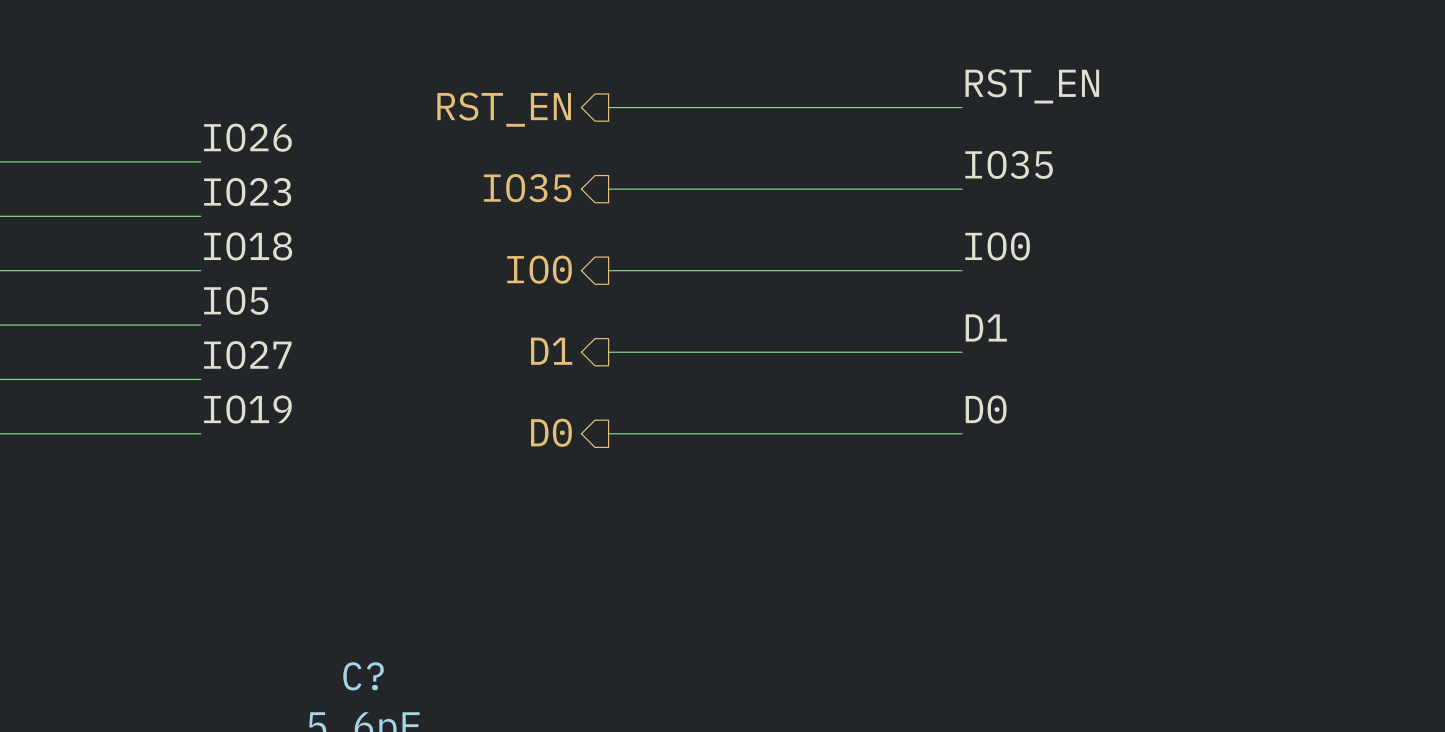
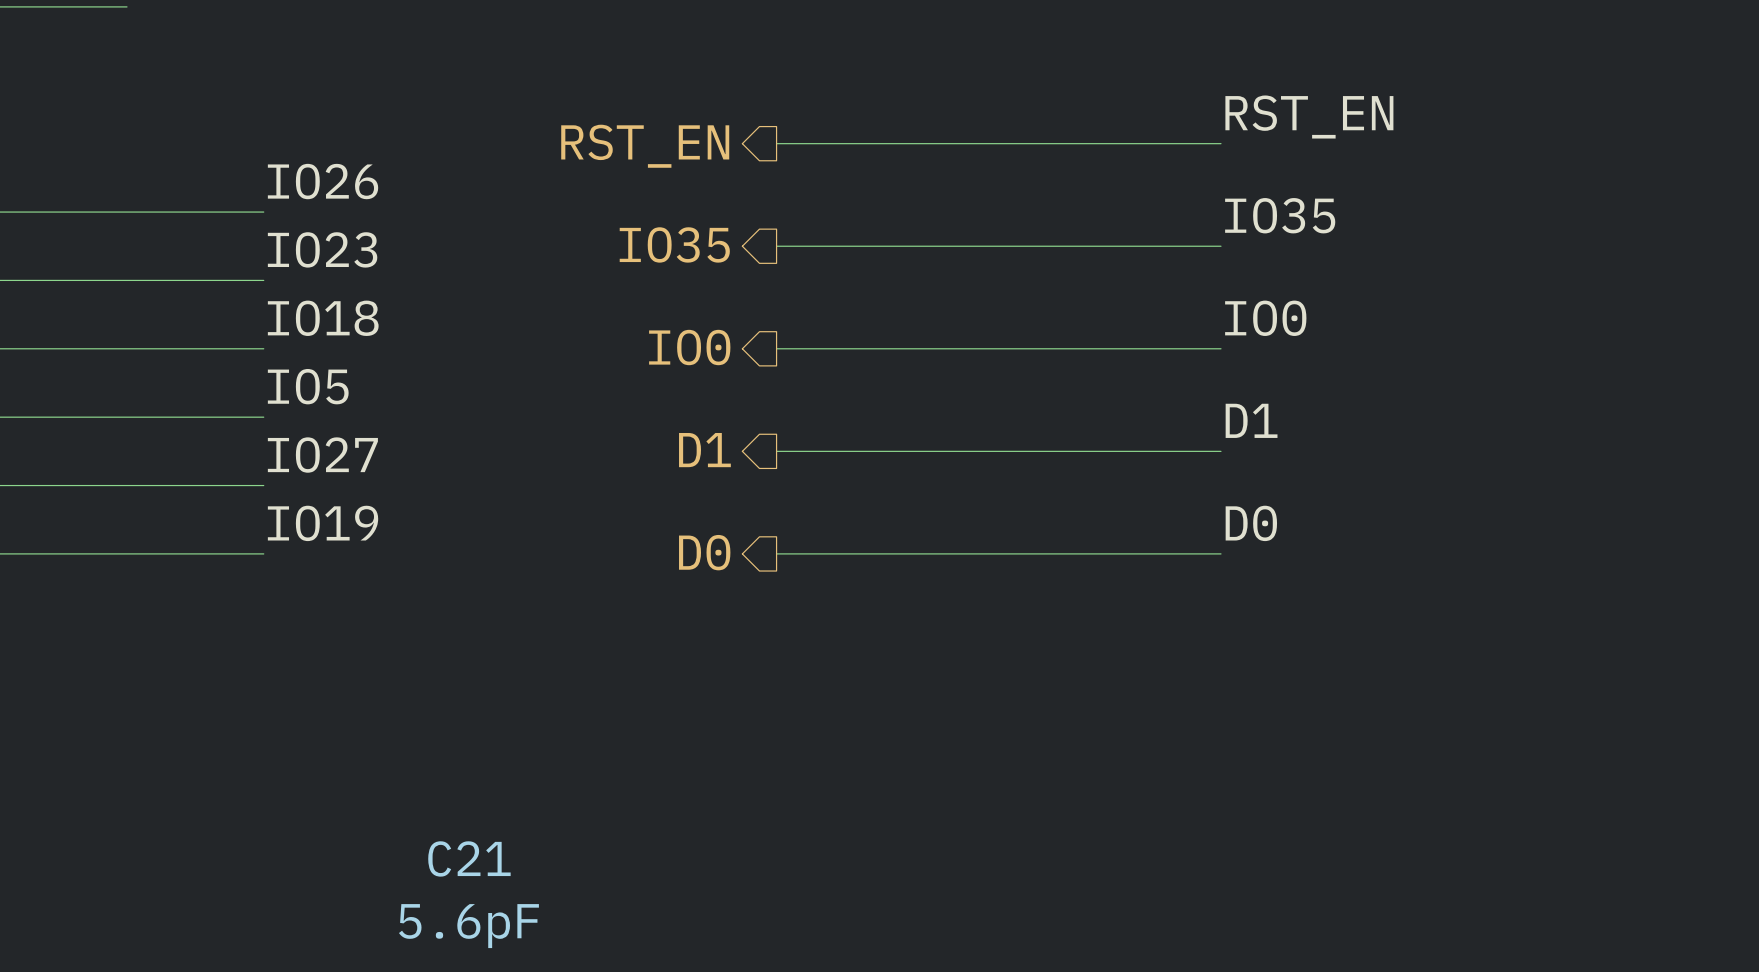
C? name: C? (363, 676) -> C21 (469, 858)

